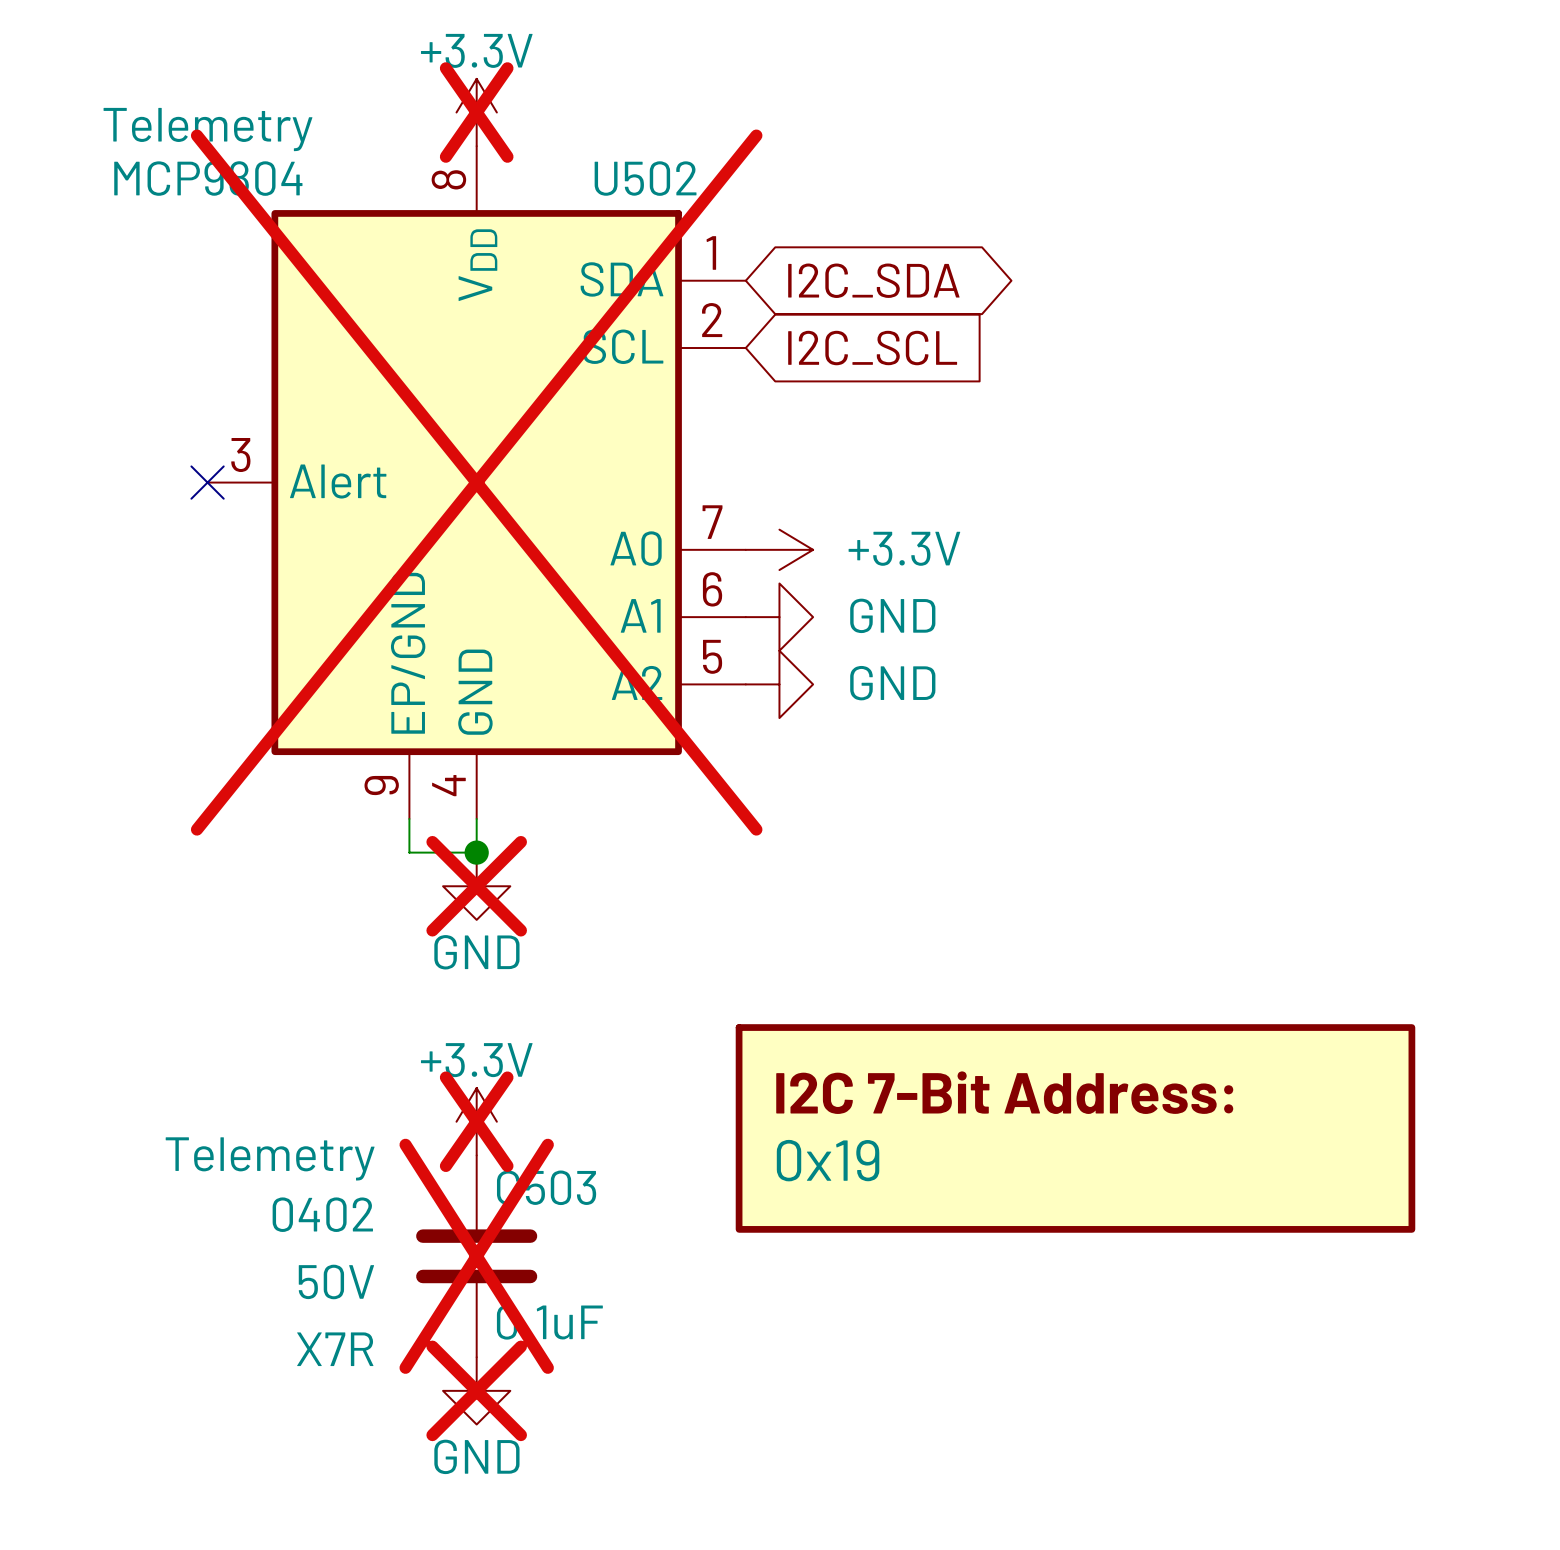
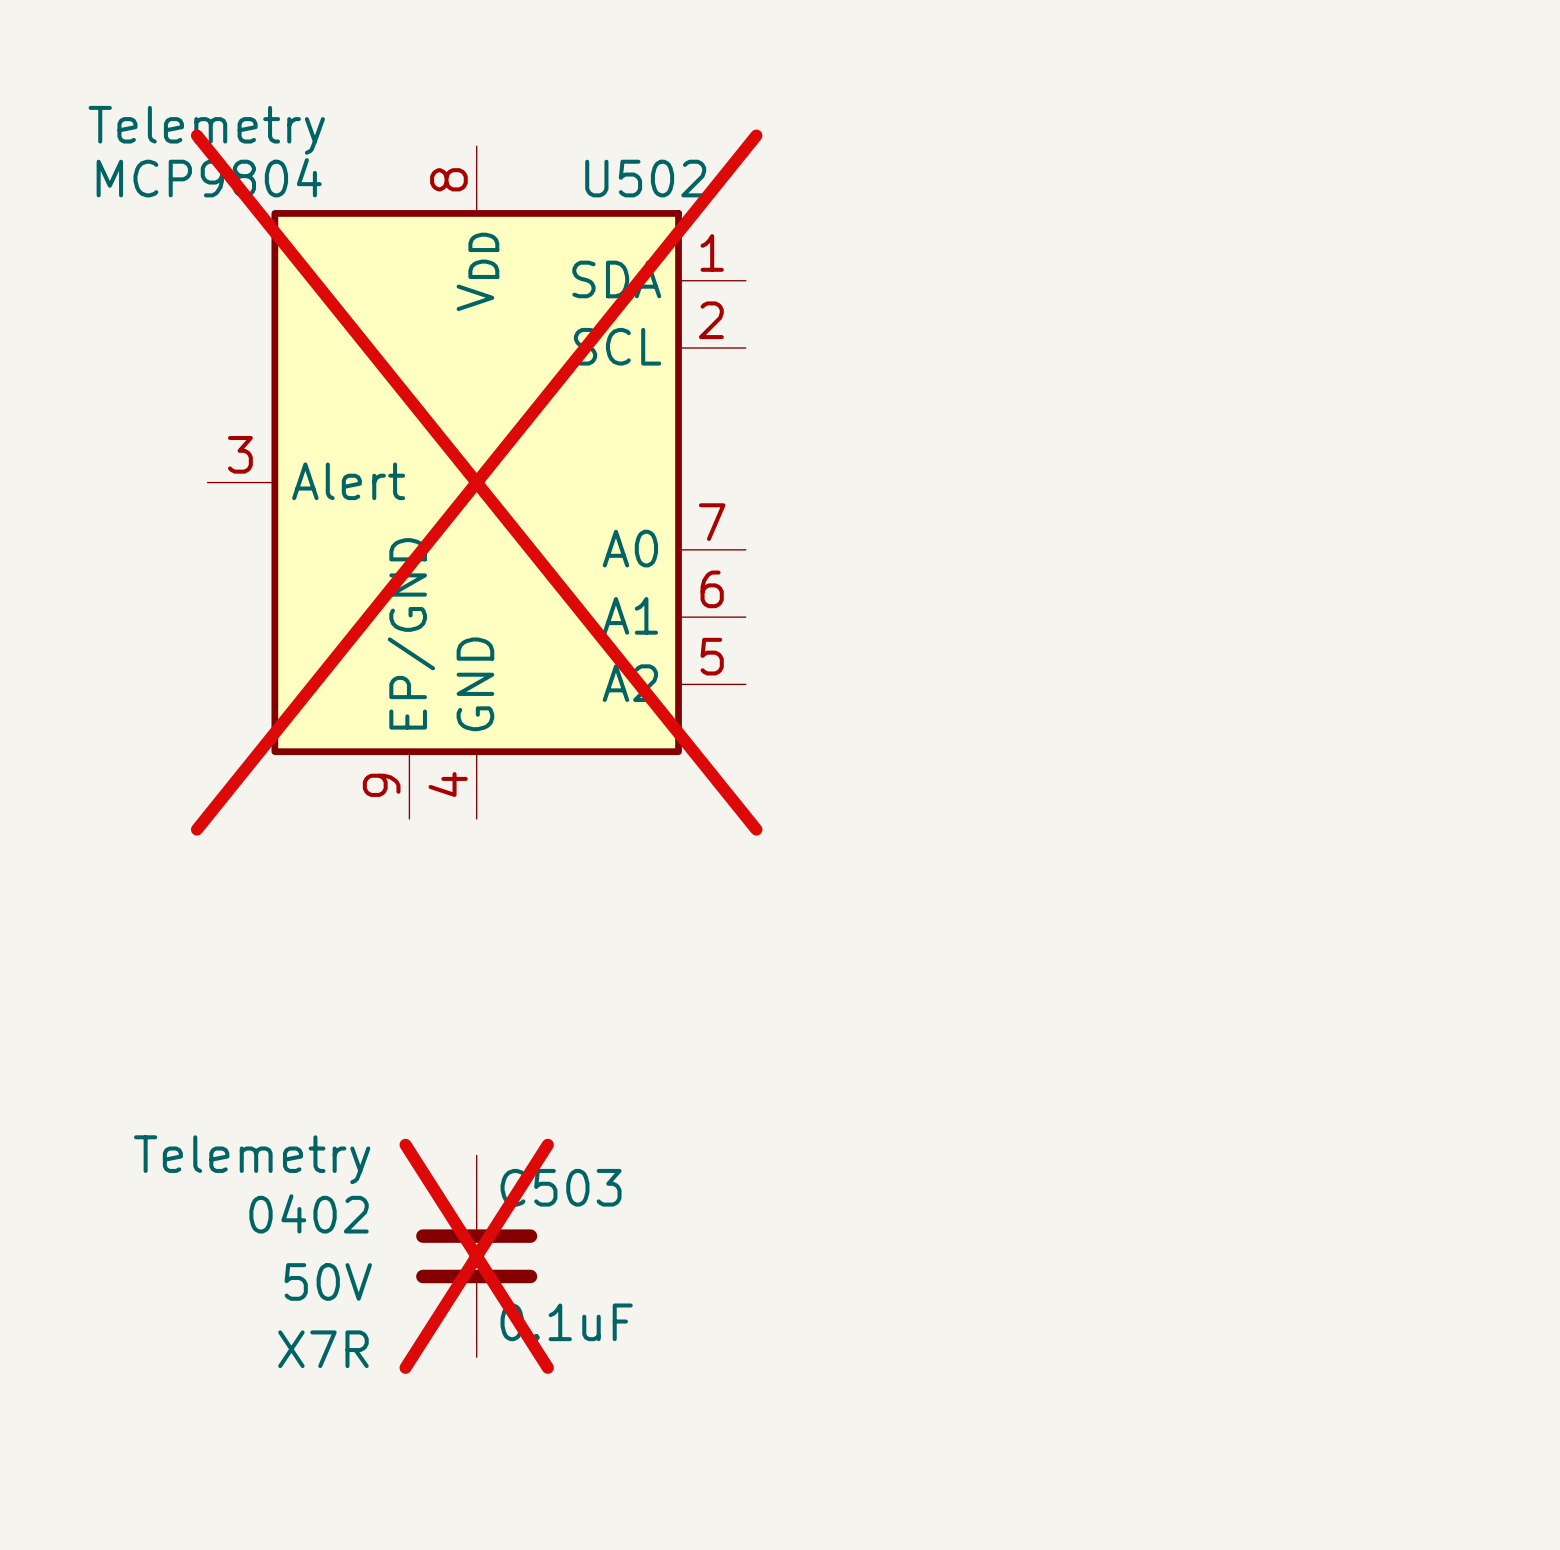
power symbol: +3.3V (476, 112) -> none
global label: I2C_SDA (873, 280) -> none
global label: I2C_SCL (872, 348) -> none
no-connect mark: (207, 482) -> none
power symbol: +3.3V (779, 549) -> none
power symbol: GND (779, 617) -> none
power symbol: GND (779, 684) -> none
wire: (409, 818) (409, 852) (476, 852) (476, 818) -> none
junction: (476, 852) -> none
power symbol: GND (476, 886) -> none
power symbol: +3.3V (476, 1121) -> none
part: 0x19 (1075, 1128) -> none
power symbol: GND (476, 1390) -> none

